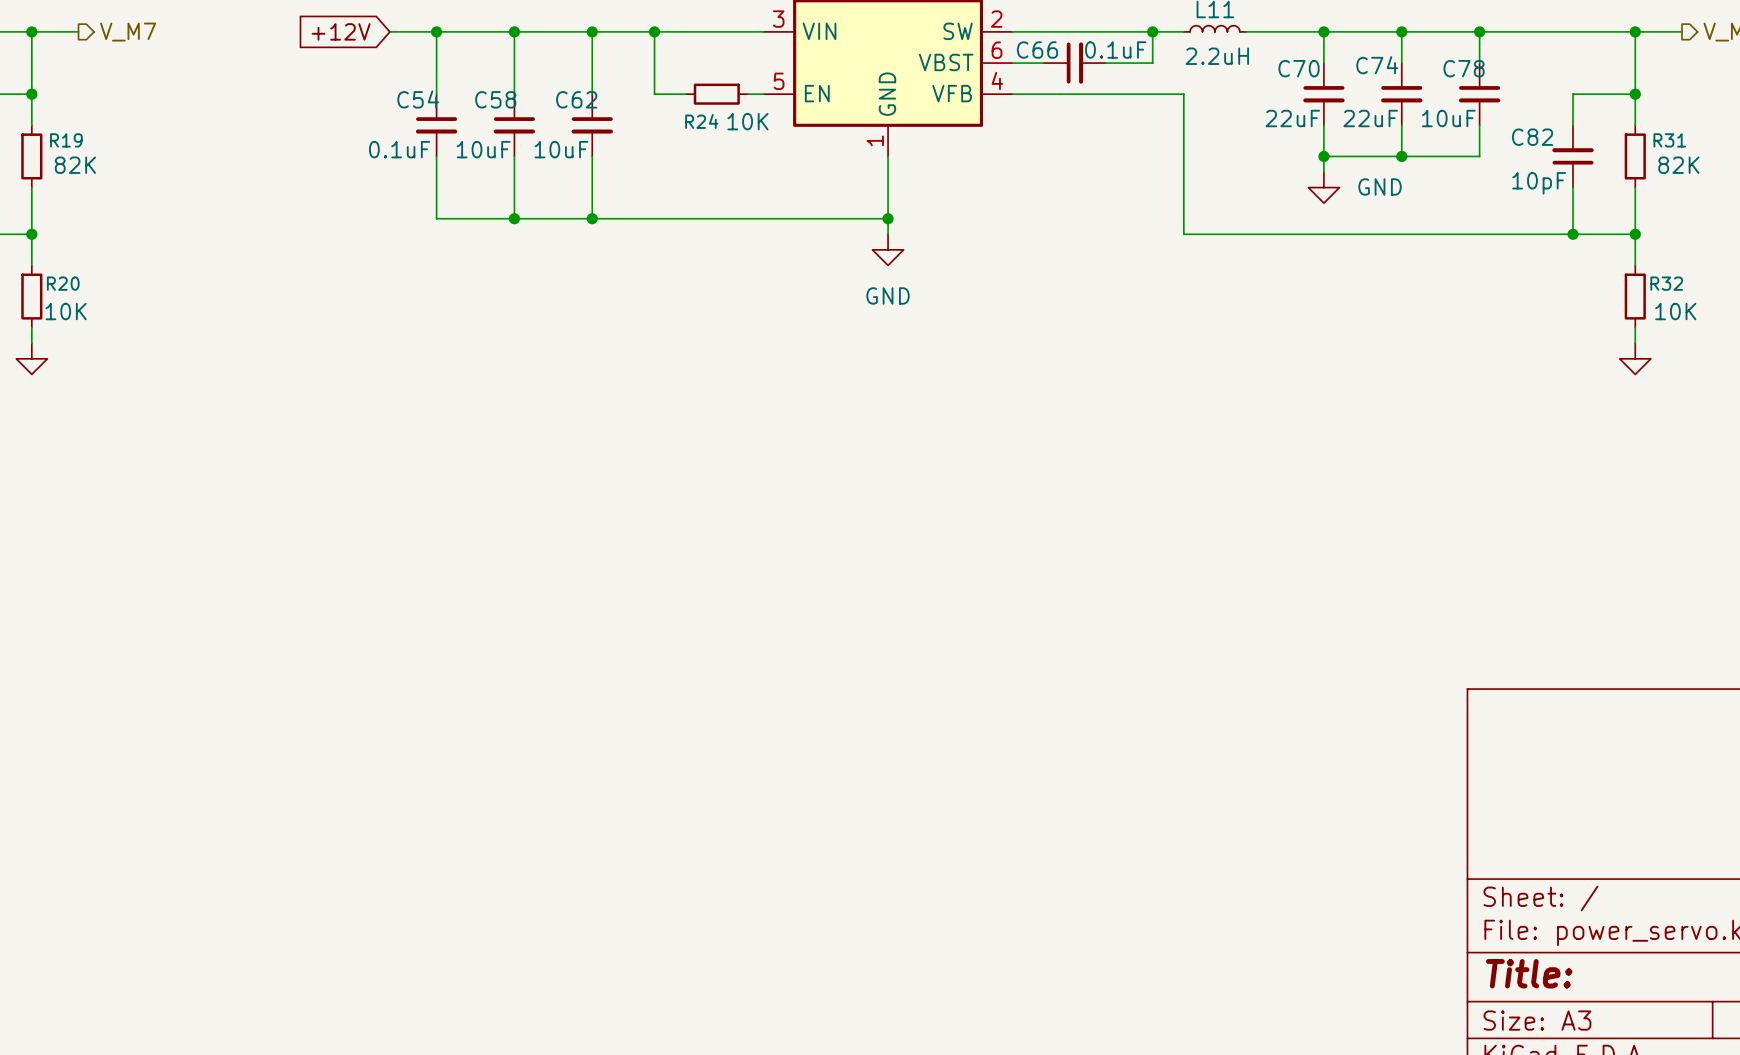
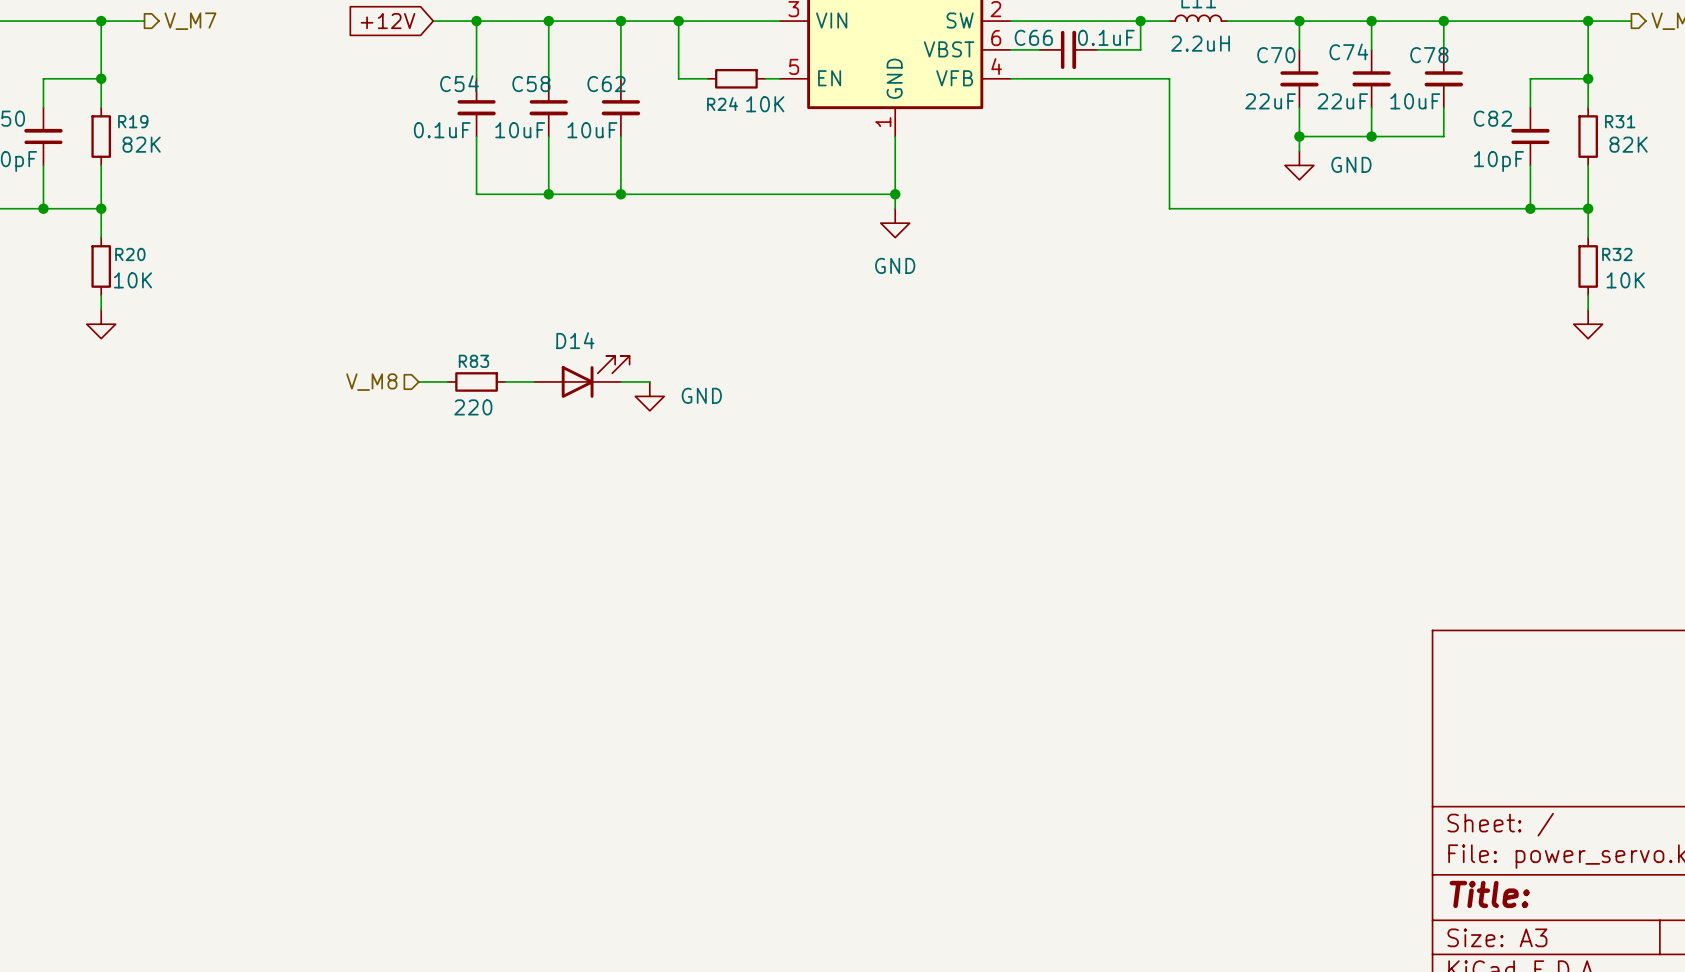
D14: none -> (581, 376)
hierarchical label: none -> V_M8 (371, 382)
wire: none -> (418, 381) (447, 381)
R83: none -> 220 (476, 381)
wire: none -> (505, 381) (534, 381)
wire: none -> (620, 381) (649, 381)
power symbol: none -> GND (649, 396)

